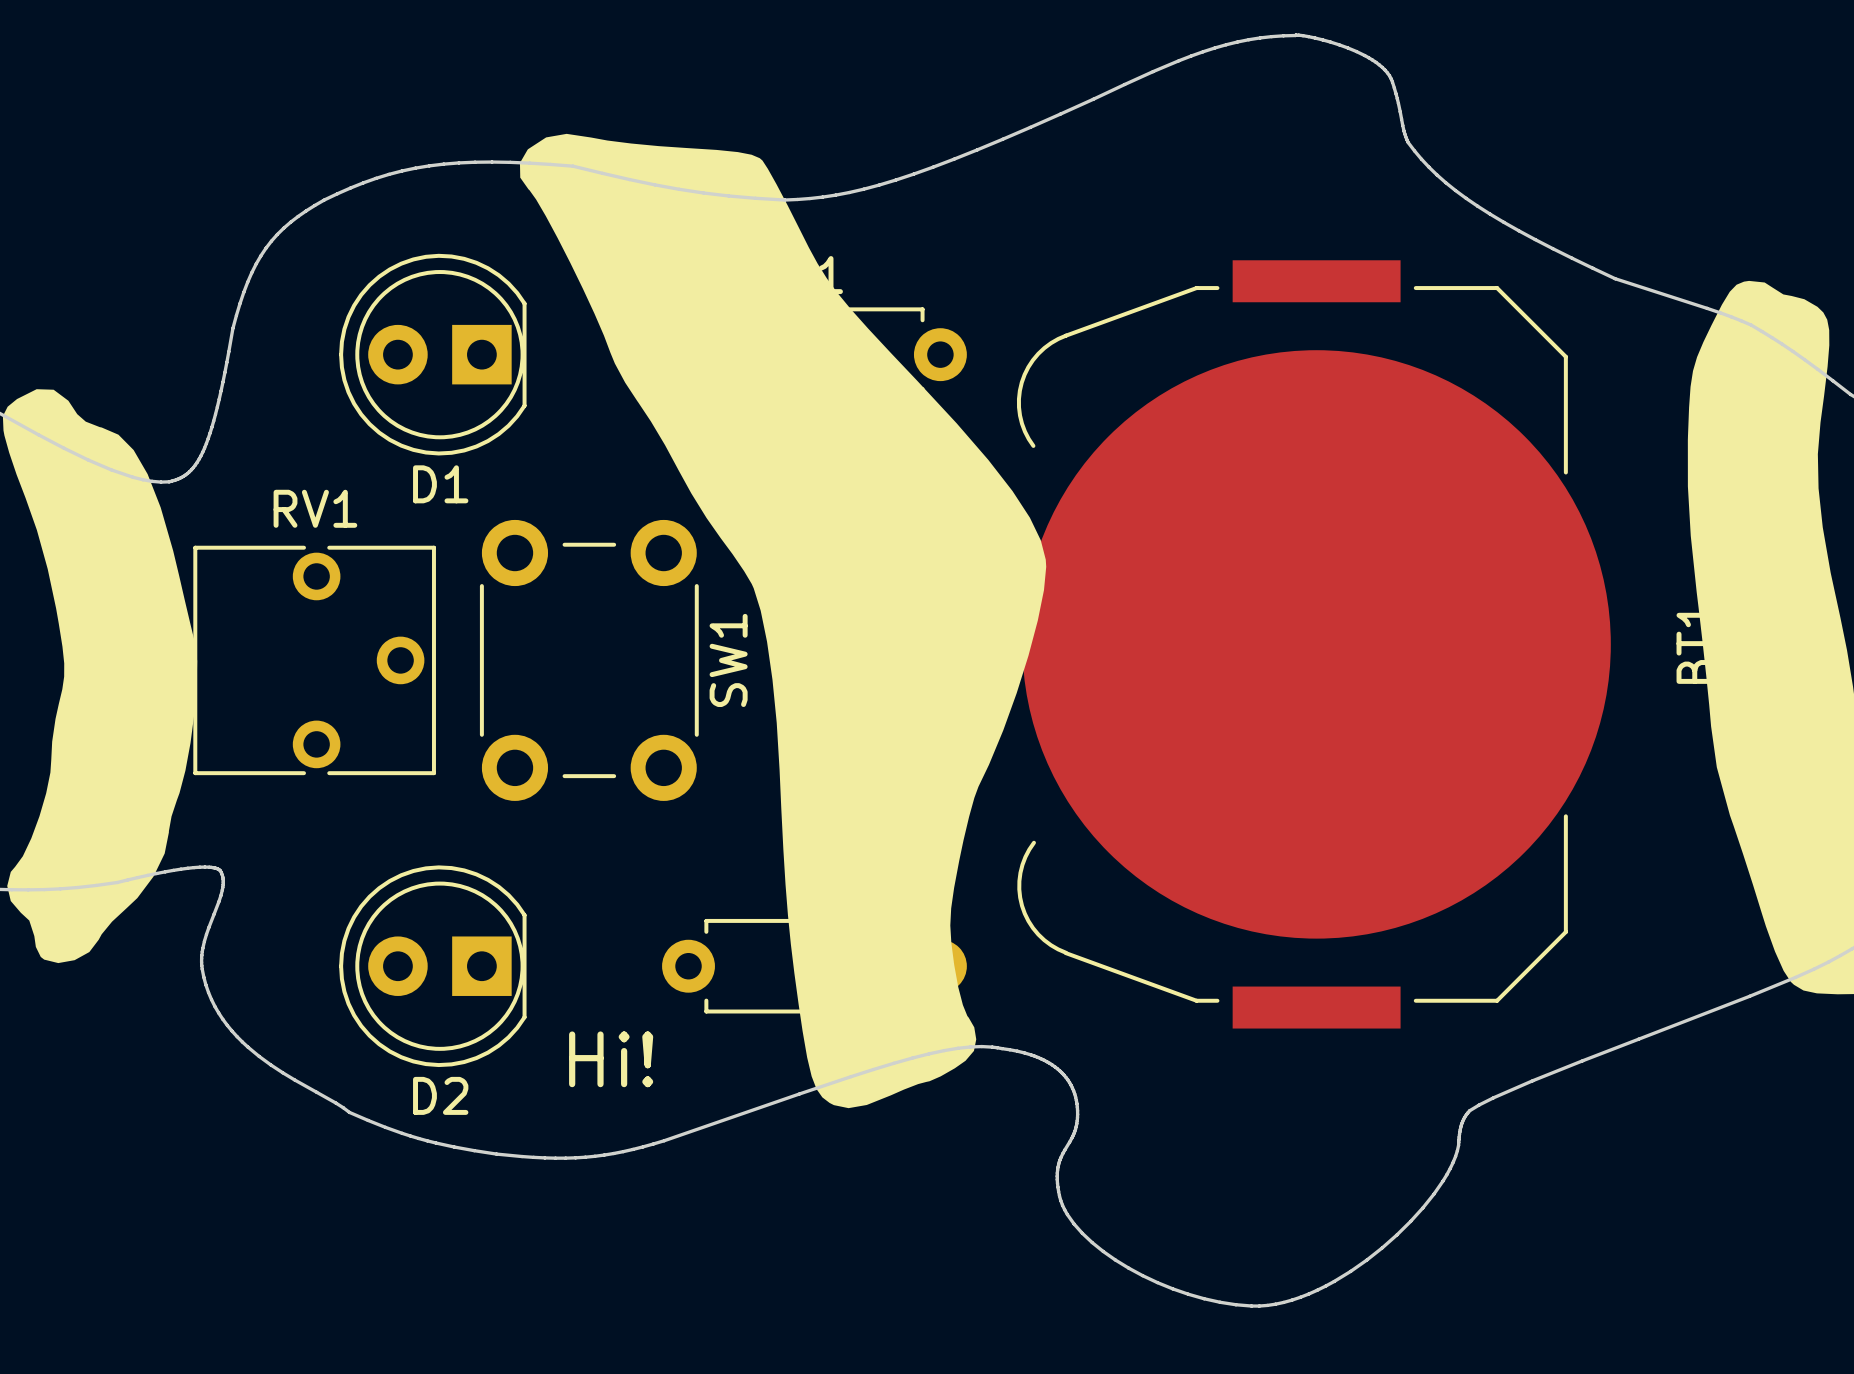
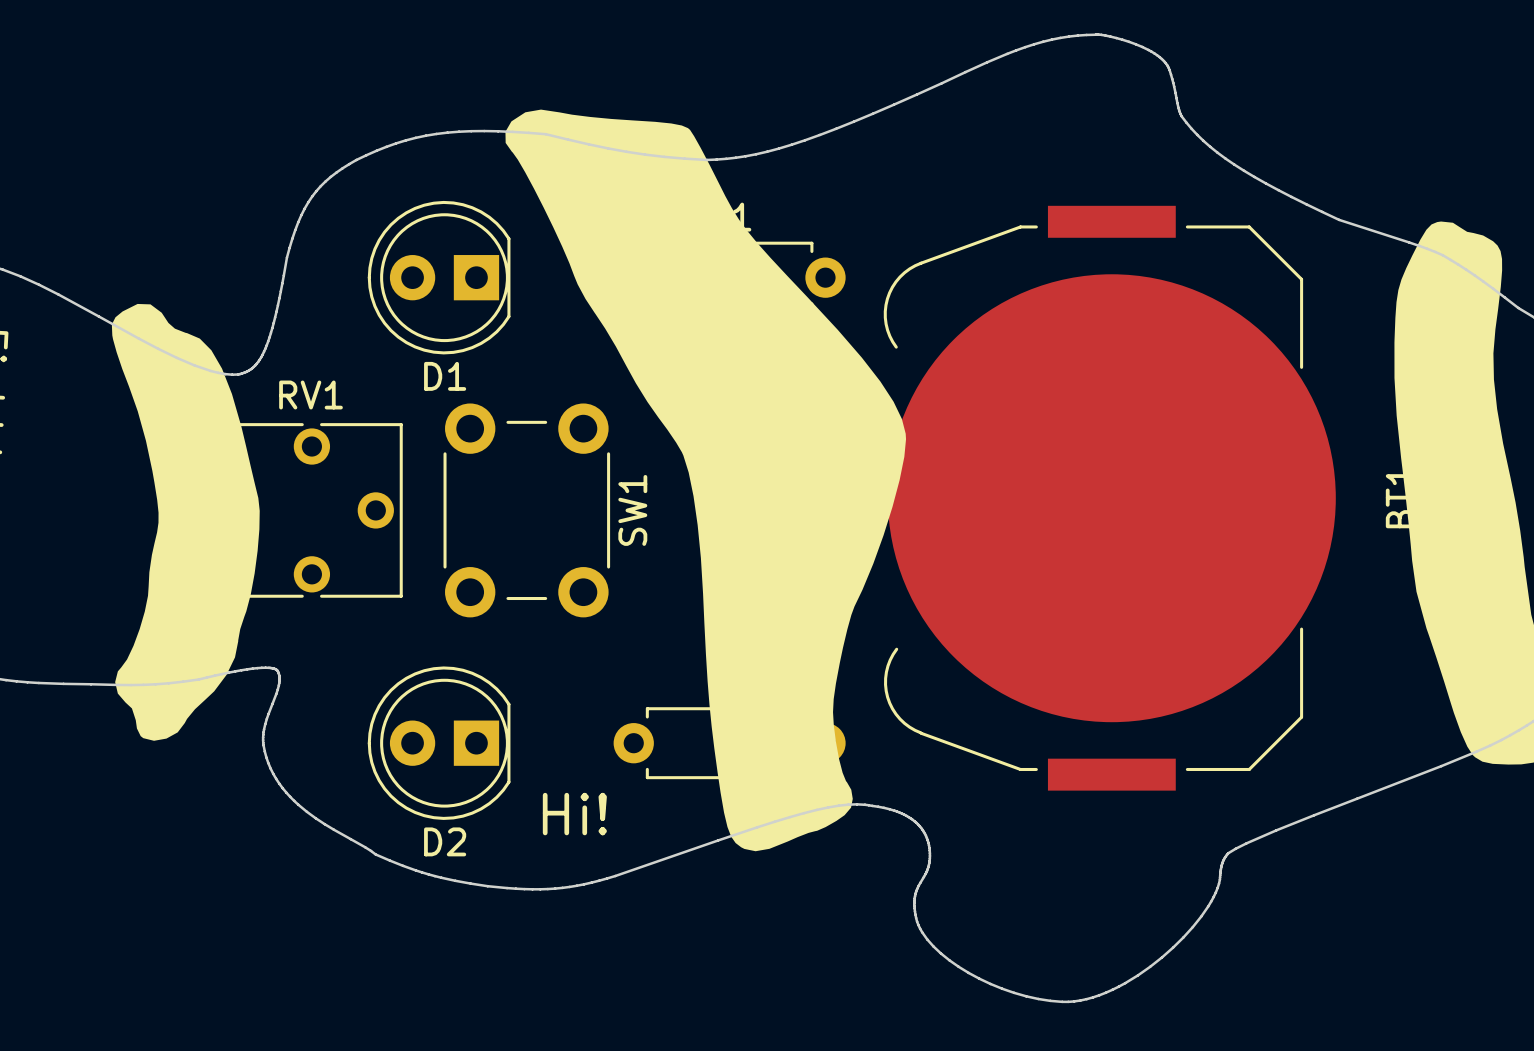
RV1 position: (314, 660) -> (310, 510)
SW1 position: (589, 660) -> (526, 510)

